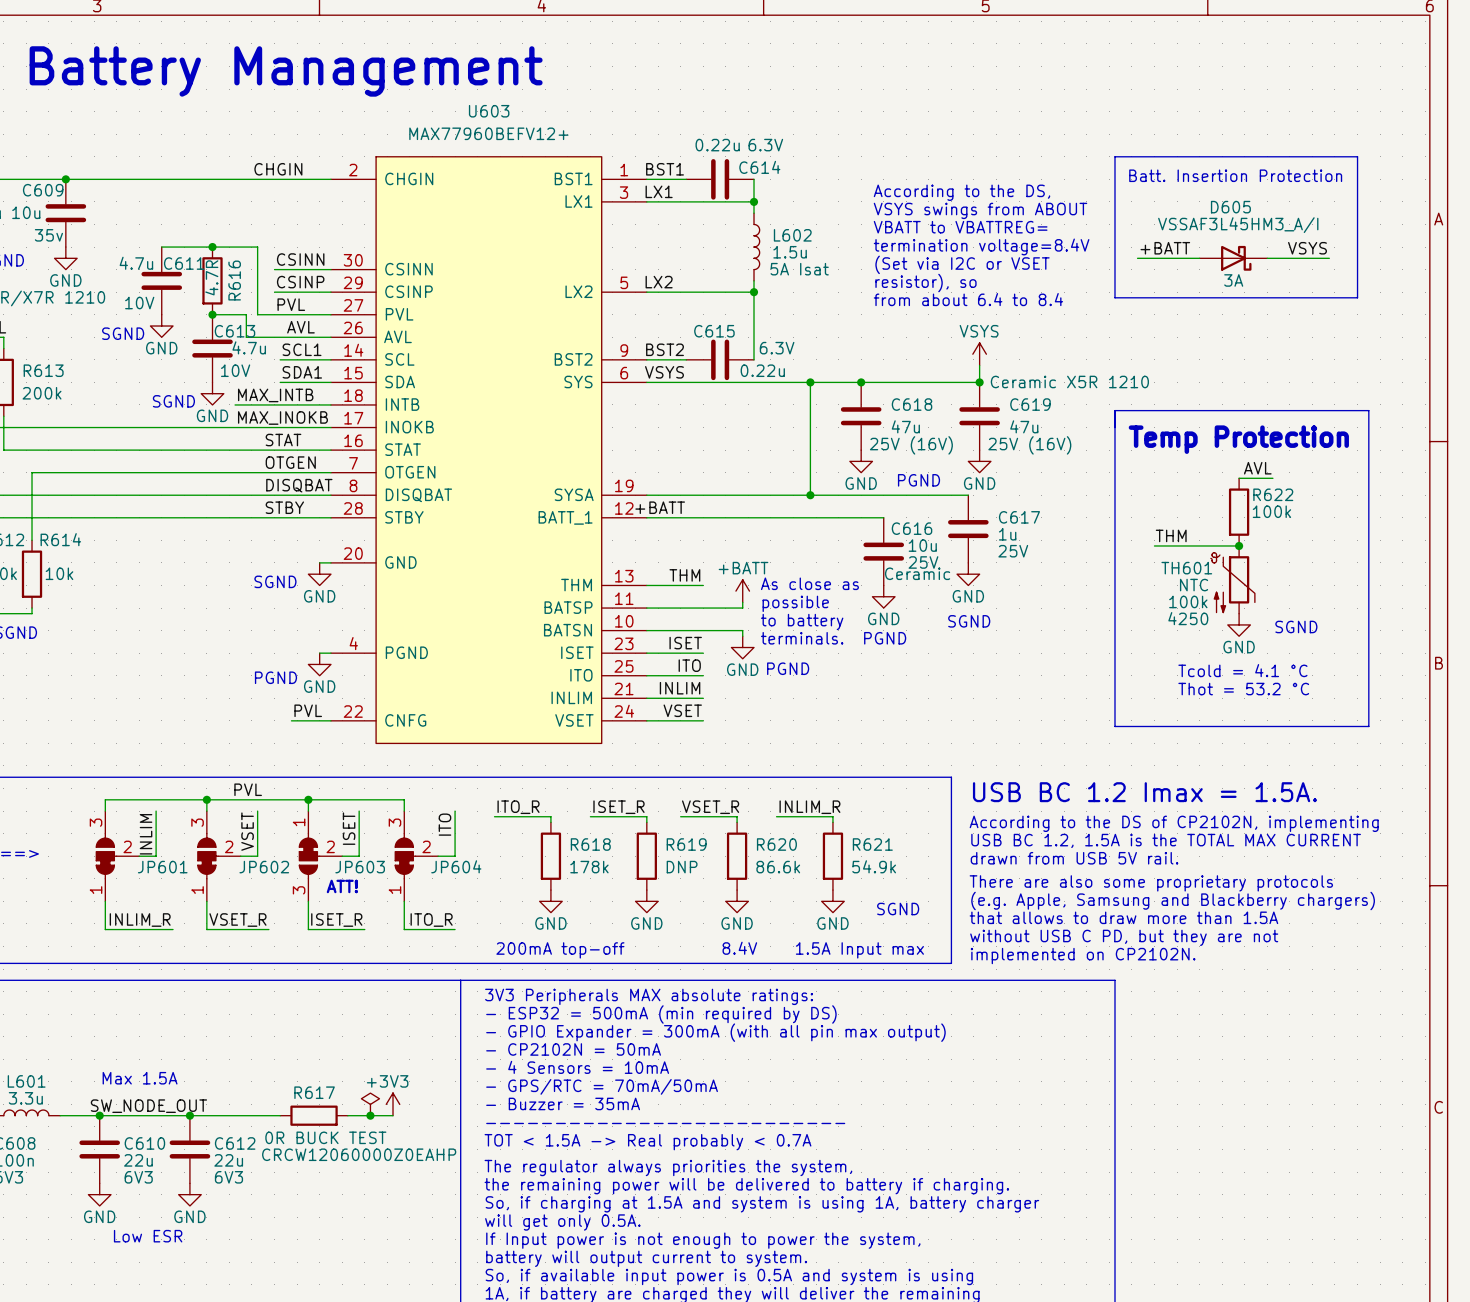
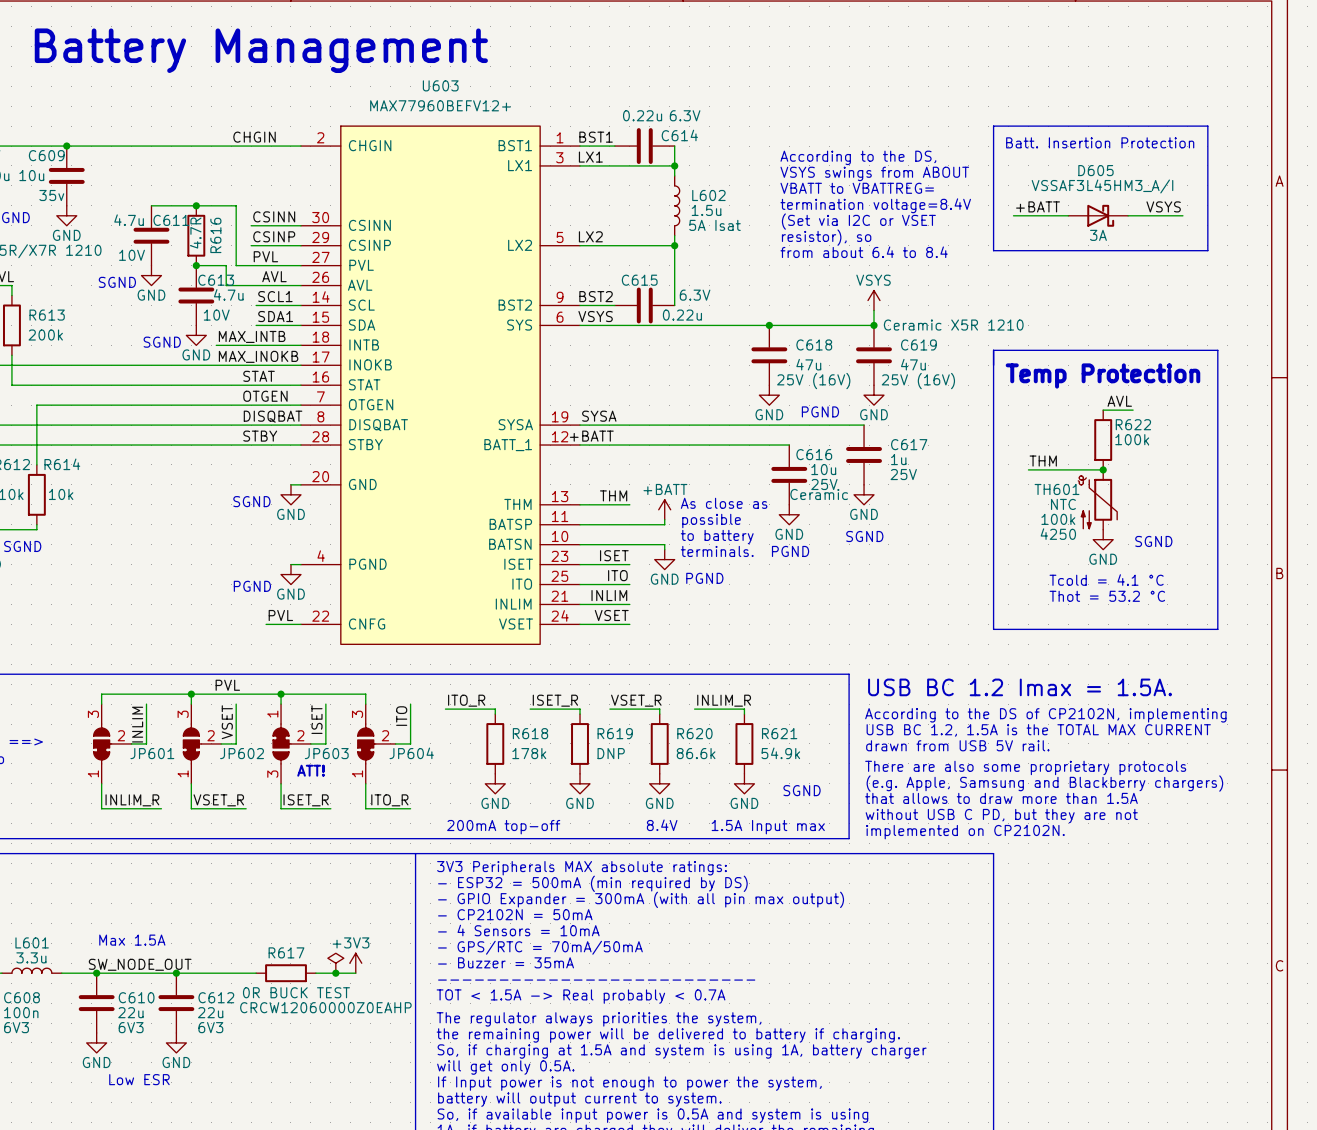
wire: (810, 382) (810, 495) -> none
junction: (810, 382) -> none
label: none -> SYSA (599, 416)
junction: (810, 495) -> none

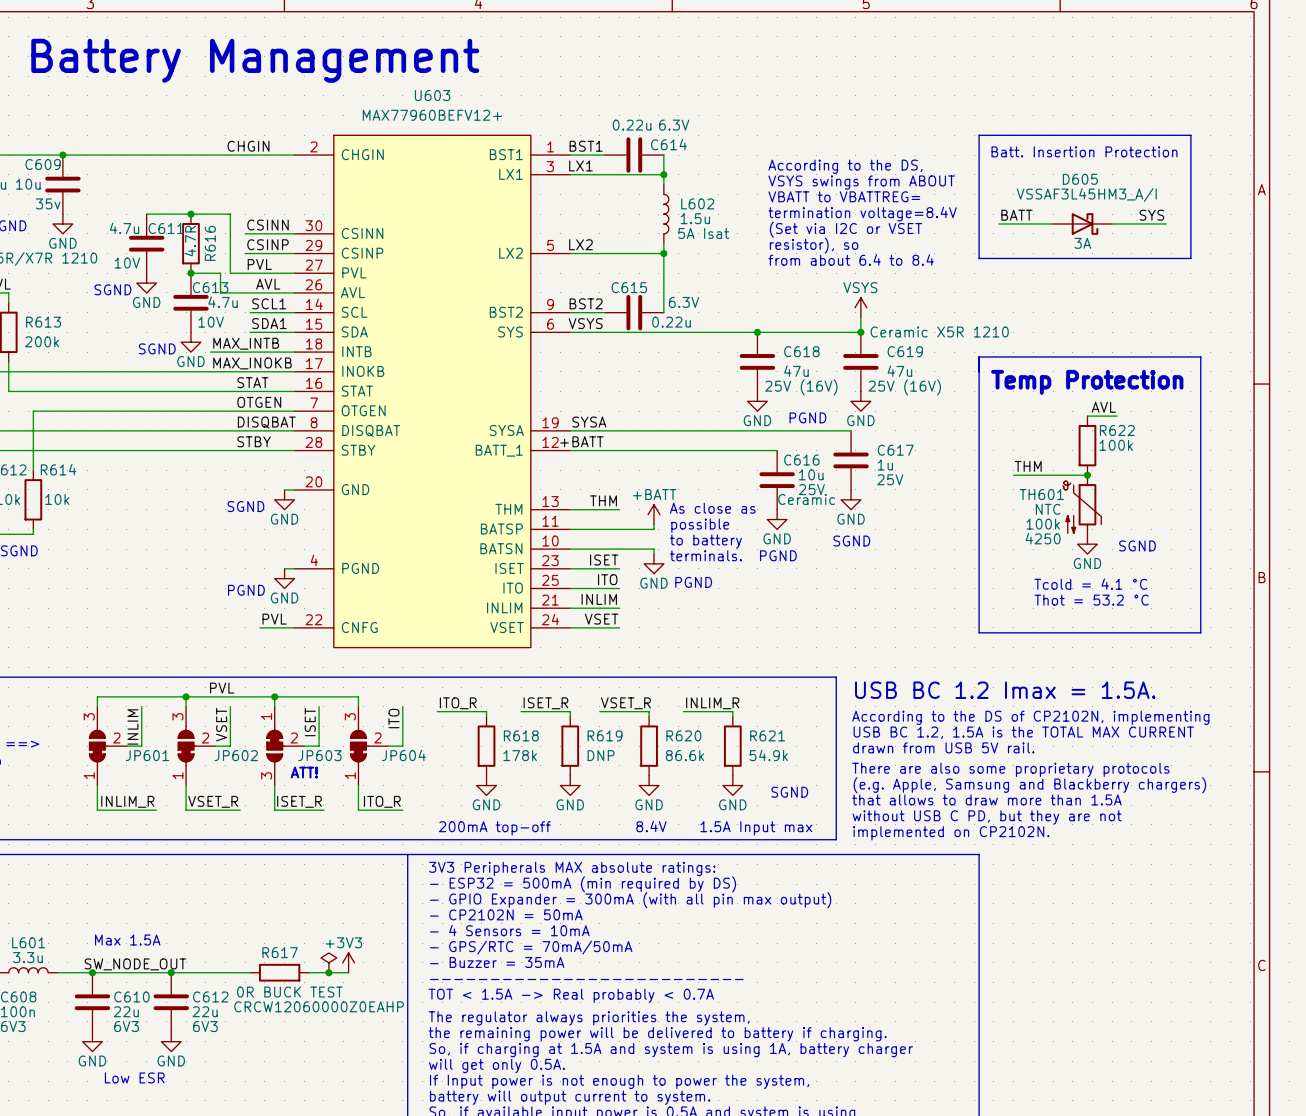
label: +BATT (1038, 206) -> BATT (1016, 215)
label: VSYS (1163, 206) -> SYS (1151, 215)

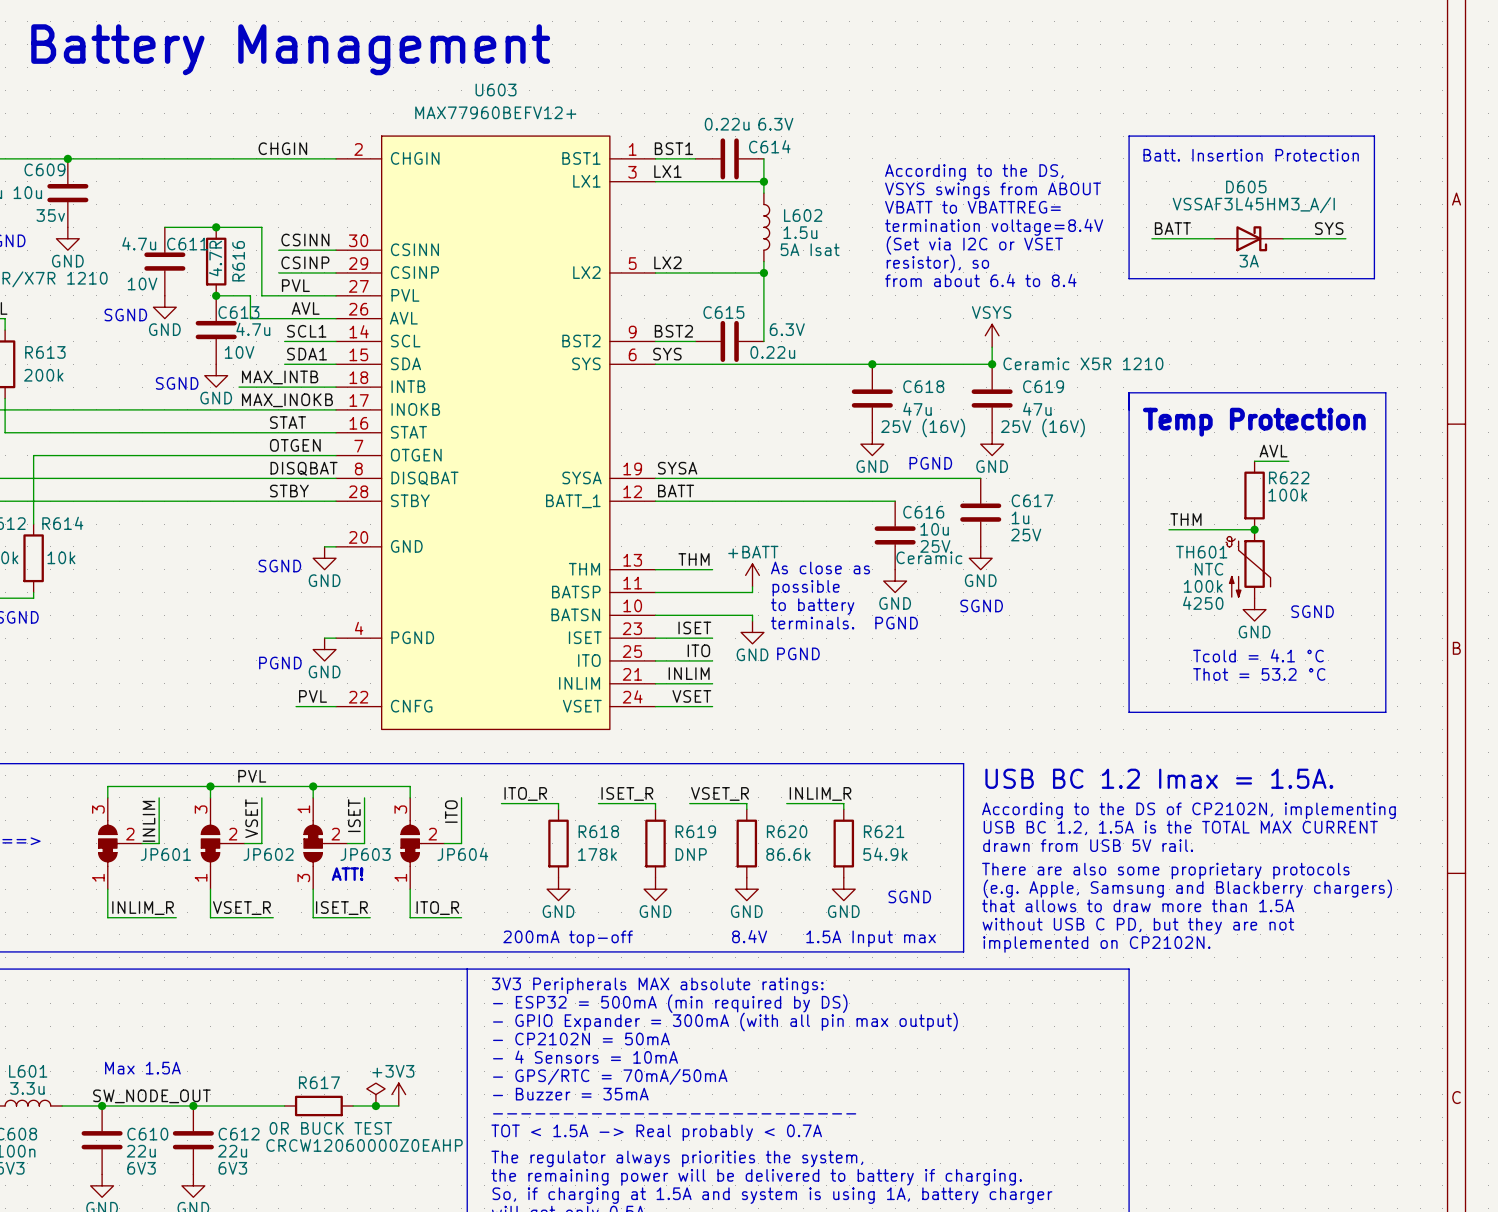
label: VSYS (585, 323) -> SYS (667, 354)
label: +BATT (581, 441) -> BATT (676, 491)

